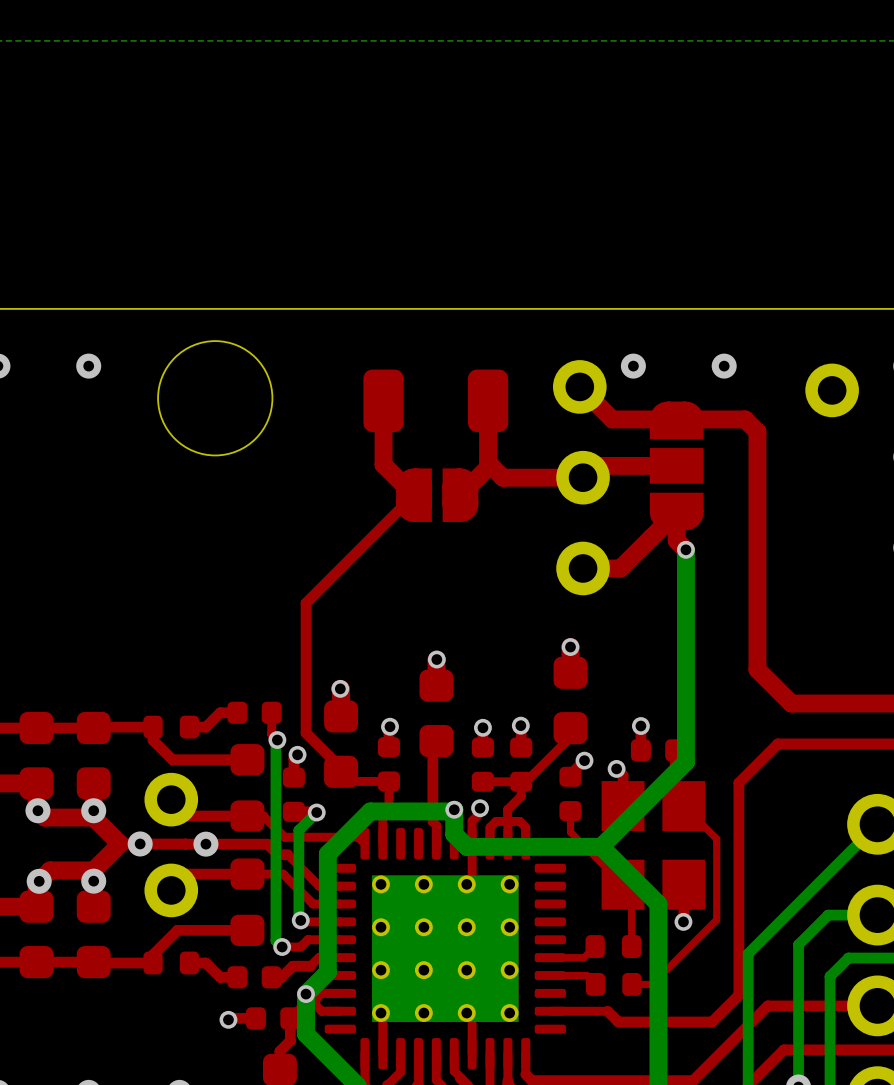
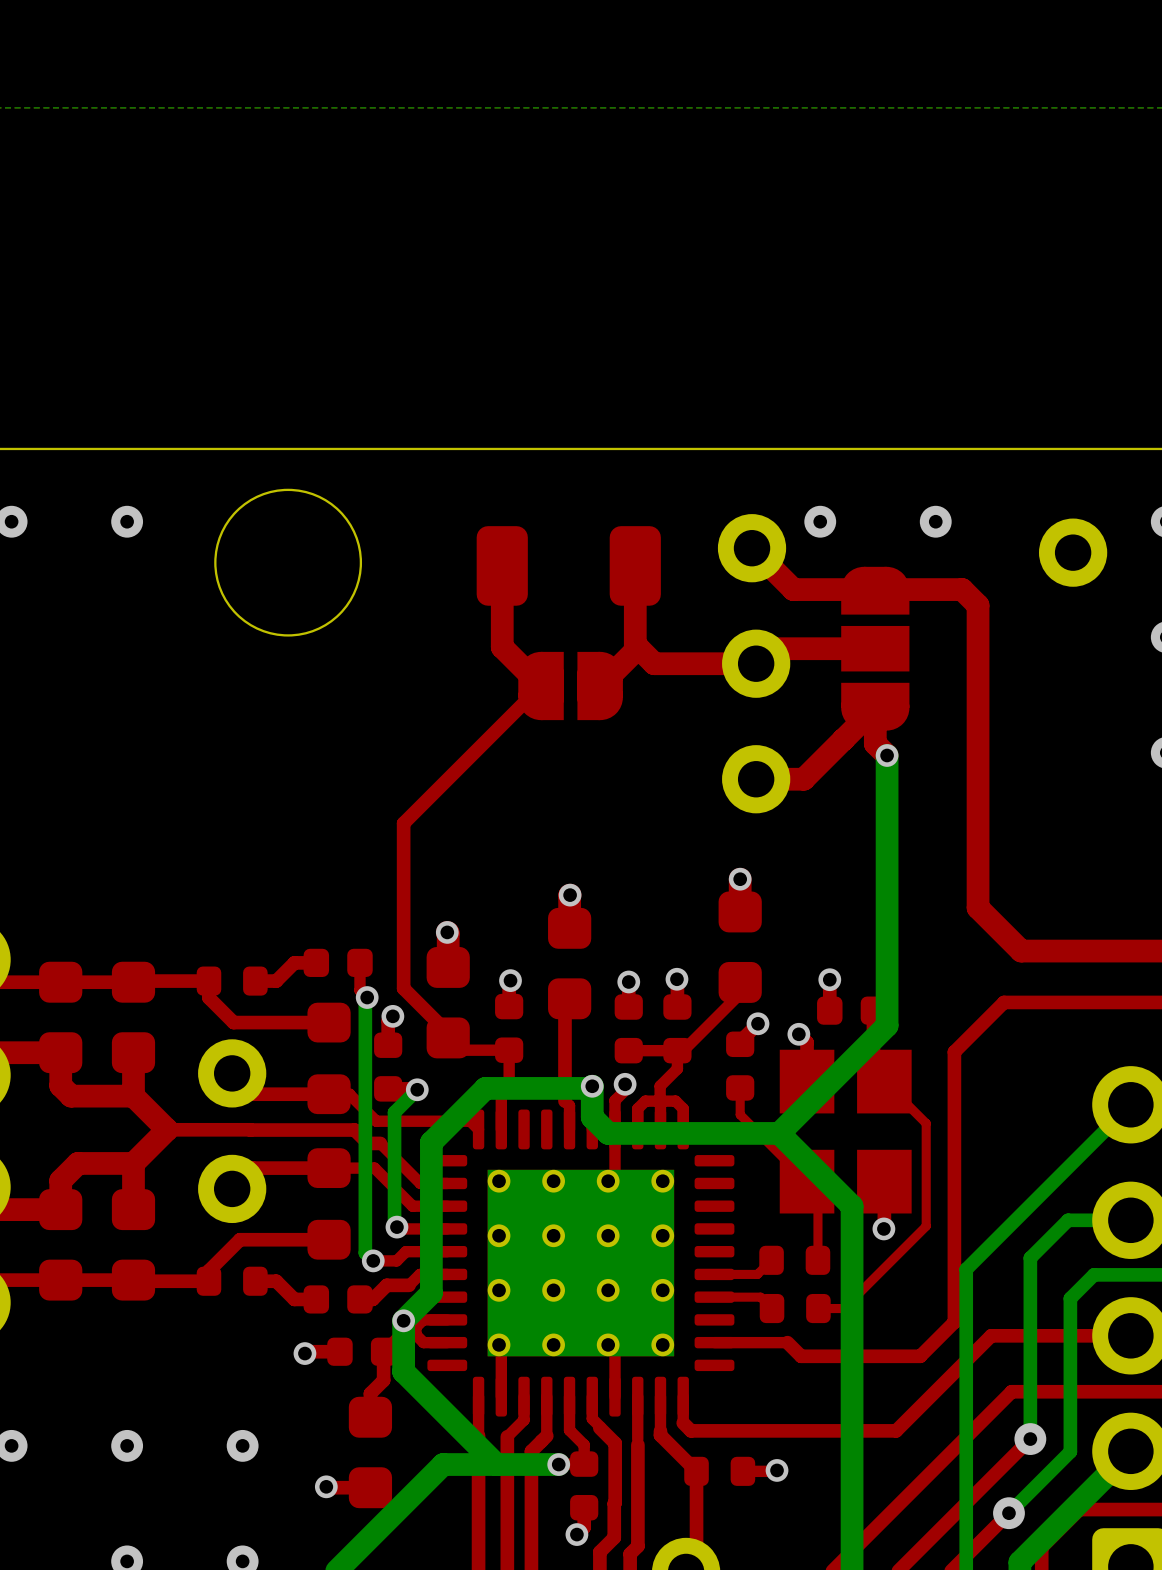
via: (37, 810) -> none
via: (93, 810) -> none
via: (140, 843) -> none
via: (205, 844) -> none
via: (39, 881) -> none
via: (93, 881) -> none

